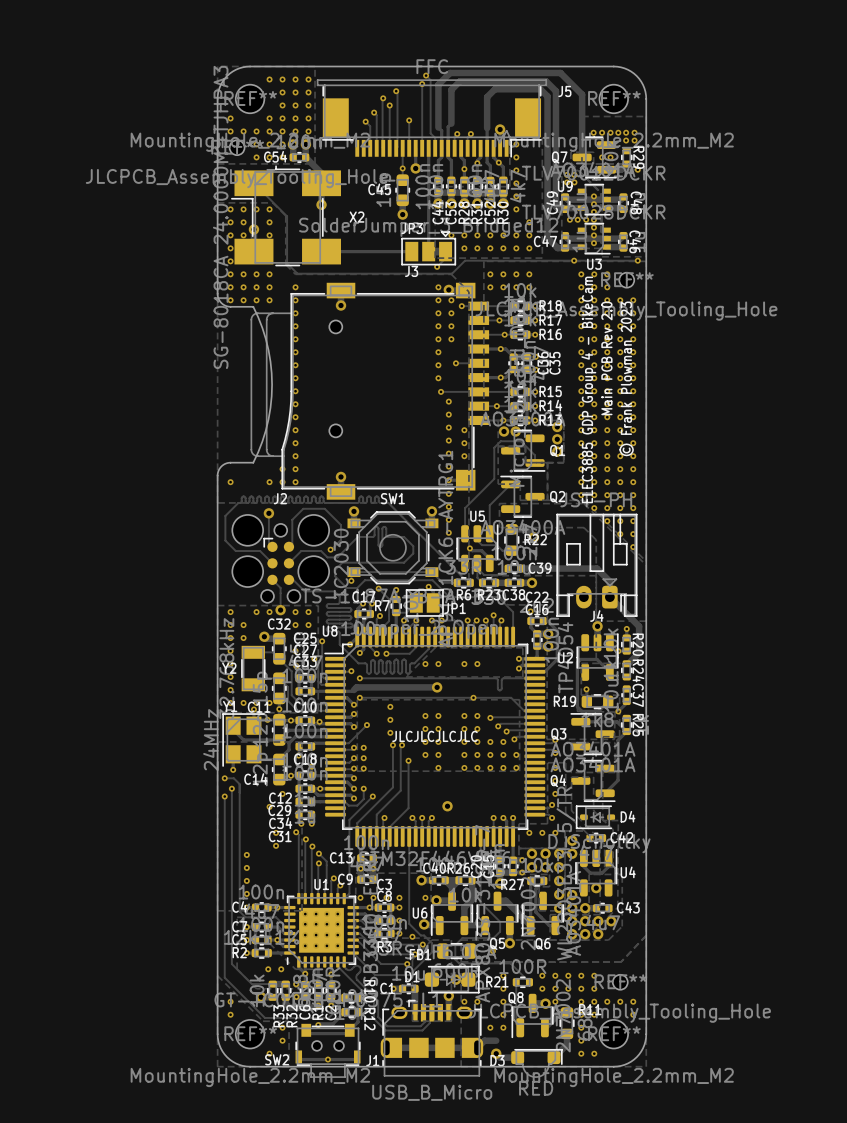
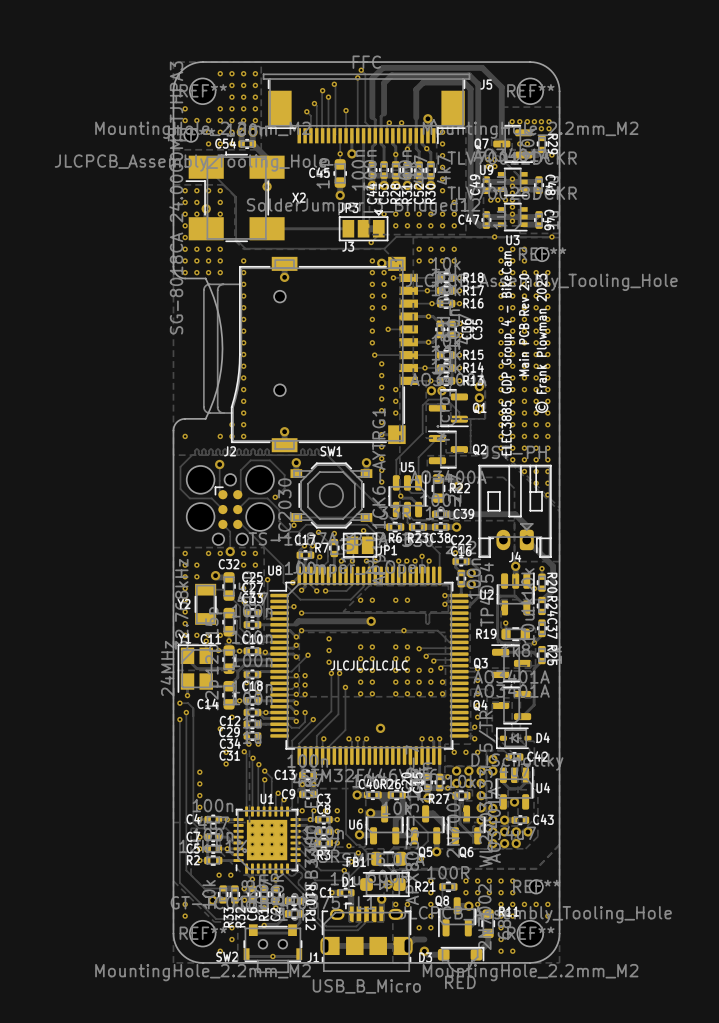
track: (321, 551) (327, 557) (337, 557) (357, 536) (373, 536) (376, 526) (378, 528) (379, 546) (382, 545) (382, 528) (384, 526) (387, 536) (404, 536) (413, 546) (413, 553) (404, 562) (342, 562) (335, 569) -> (266, 498) (279, 510) (279, 515)
track: (304, 591) (334, 591) (339, 596) (339, 602) (327, 604) (327, 607) (350, 608) (349, 611) (326, 613) (328, 615) (351, 616) (349, 619) (327, 620) (328, 623) (352, 624) (351, 627) (326, 628) (327, 631) (338, 631) (339, 633) -> (251, 534) (283, 566) (283, 572)
track: (396, 659) (392, 673) (390, 672) (389, 661) (386, 662) (384, 673) (382, 672) (381, 660) (378, 661) (377, 673) (374, 672) (374, 660) (371, 661) (369, 673) (367, 672) (367, 664) (365, 663) -> (348, 599) (306, 599)
track: (396, 659) (400, 673) (404, 659) -> none
track: (404, 659) (407, 673) (409, 672) (410, 664) (411, 663) -> none
via: none -> (360, 693)

